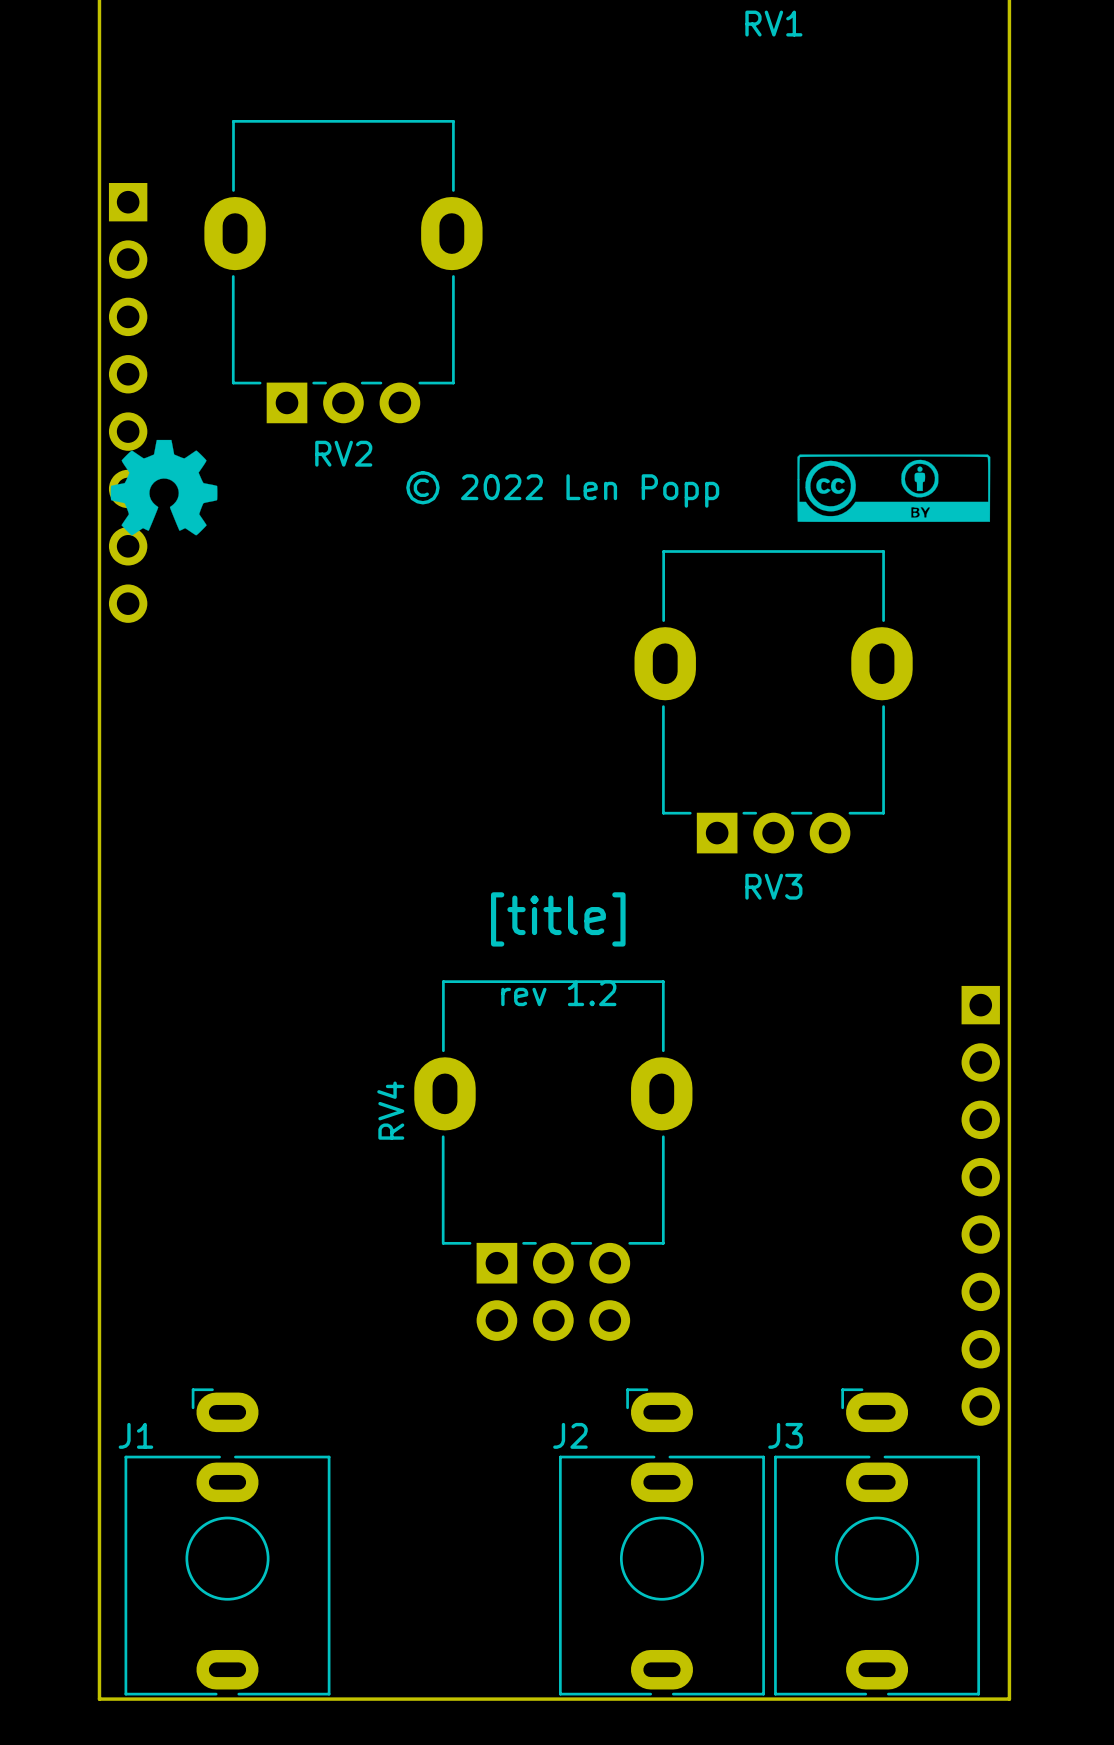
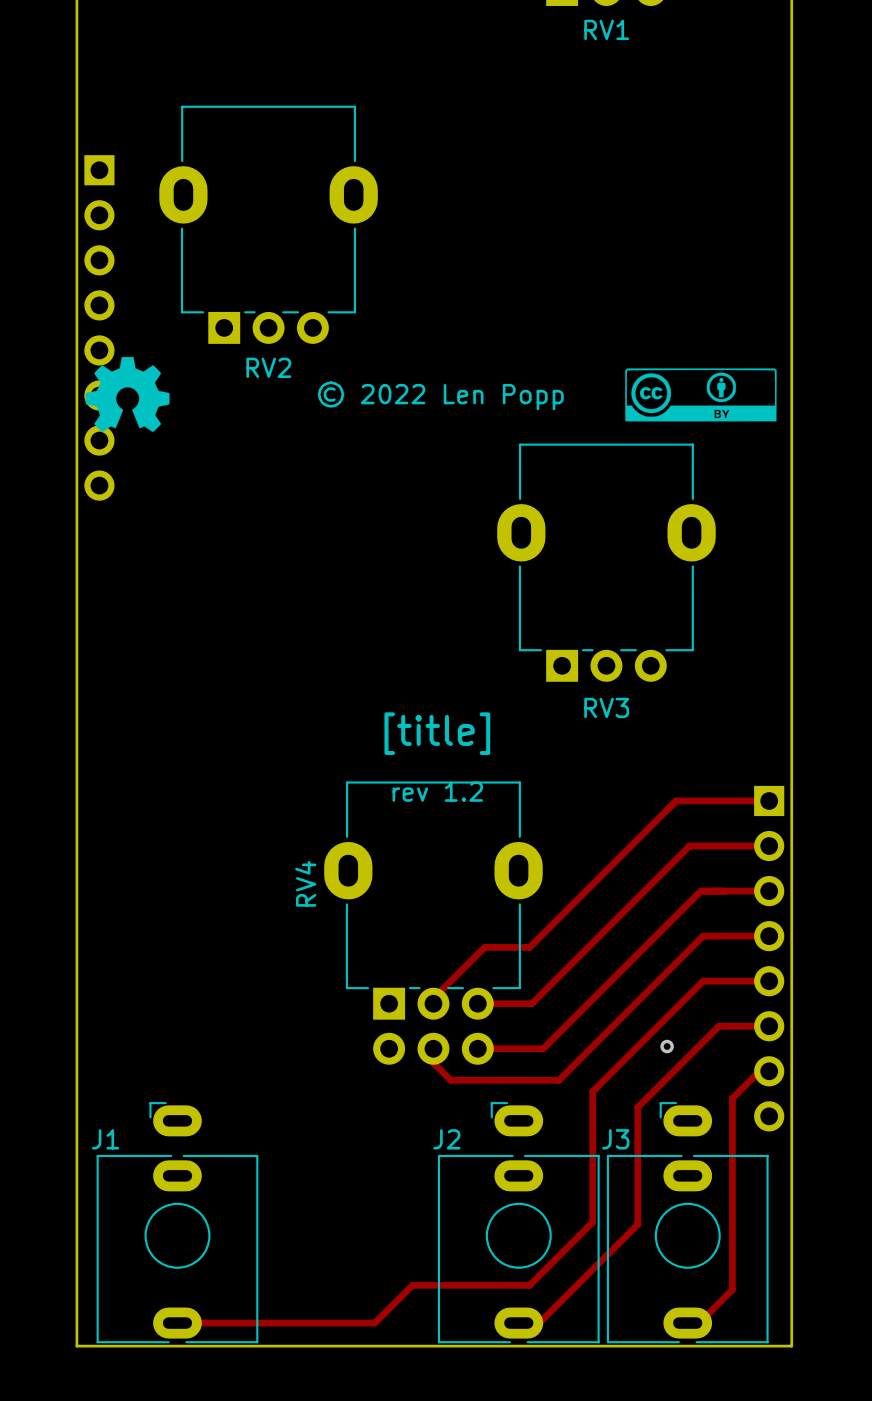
track: none -> (769, 800) (676, 800) (529, 947) (484, 947) (433, 998) (433, 1003)
track: none -> (769, 846) (689, 846) (531, 1003) (477, 1003)
track: none -> (769, 891) (700, 891) (543, 1048) (477, 1048)
track: none -> (769, 936) (703, 936) (558, 1080) (450, 1080) (433, 1062) (433, 1048)
track: none -> (769, 981) (703, 981) (592, 1091) (592, 1222) (529, 1285) (412, 1285) (374, 1323) (177, 1323)
track: none -> (769, 1026) (718, 1026) (637, 1107) (637, 1224) (539, 1323) (518, 1323)
via: none -> (667, 1046)
track: none -> (769, 1071) (759, 1071) (732, 1098) (732, 1289) (699, 1323) (687, 1323)

